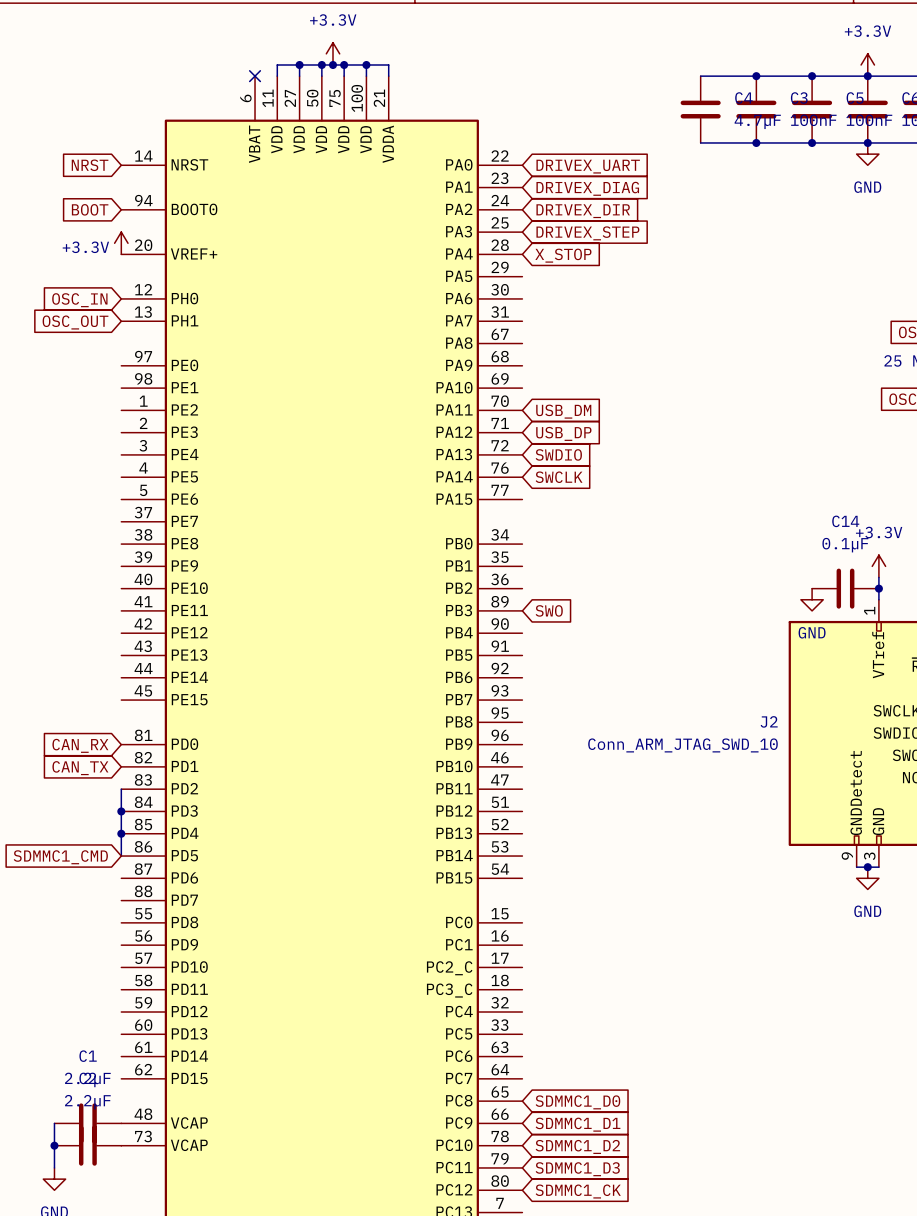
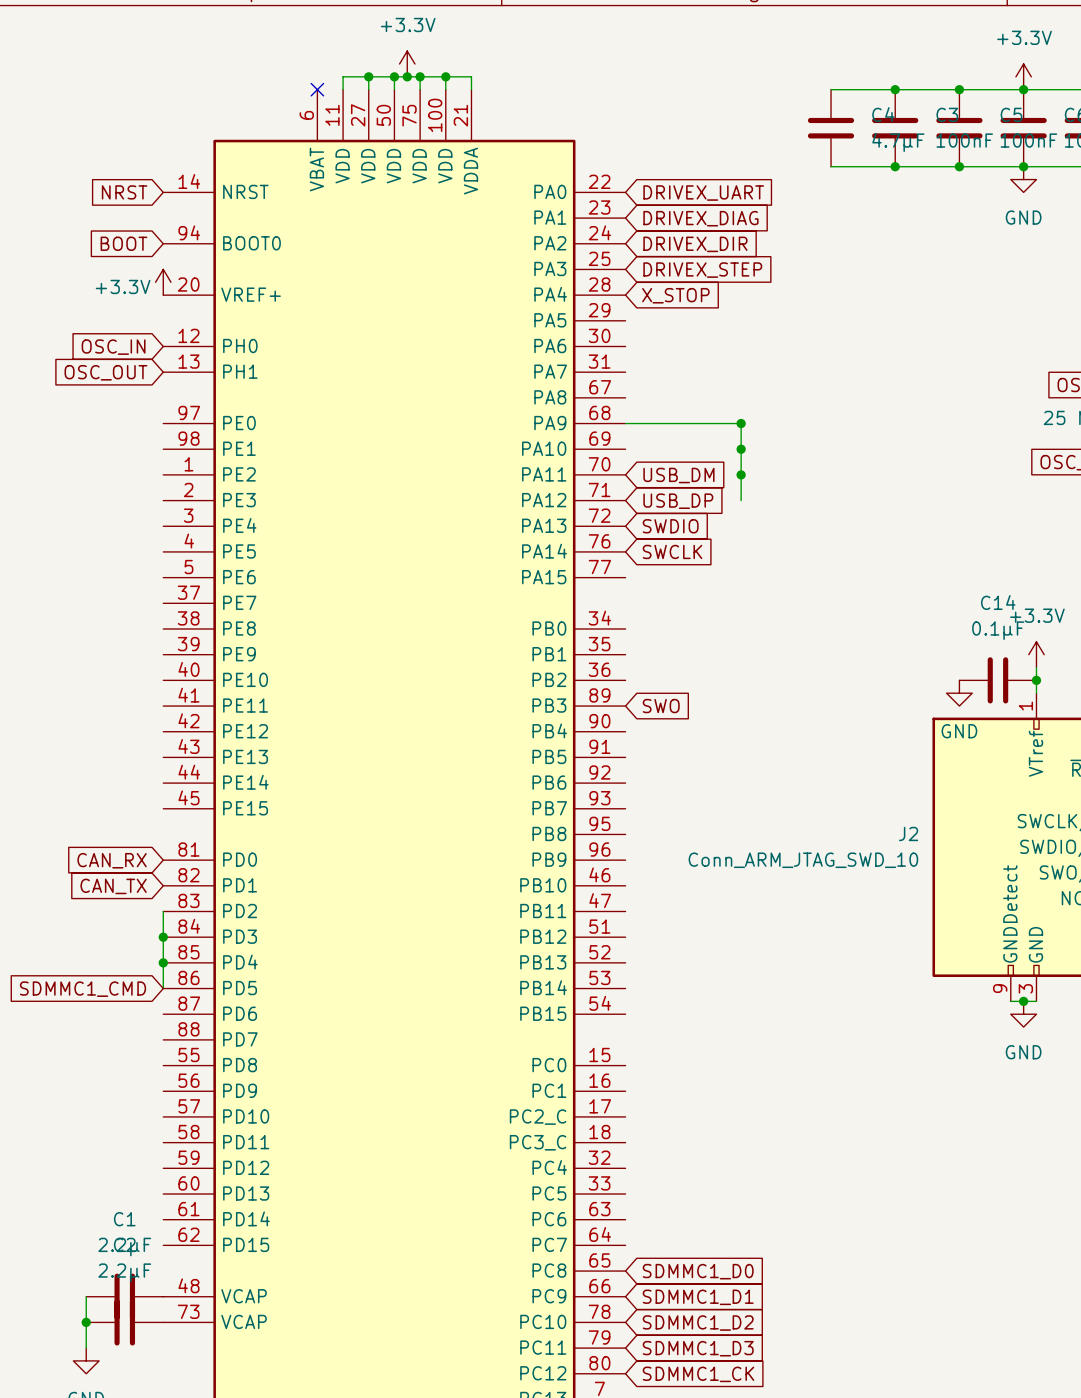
wire: none -> (625, 423) (741, 423) (741, 500)
junction: none -> (741, 423)
junction: none -> (741, 449)
junction: none -> (741, 474)

